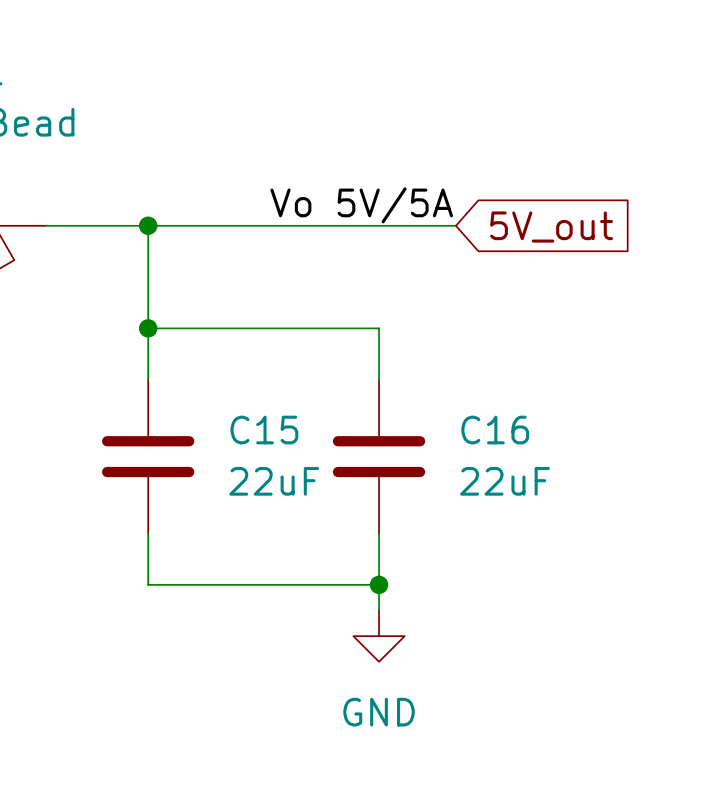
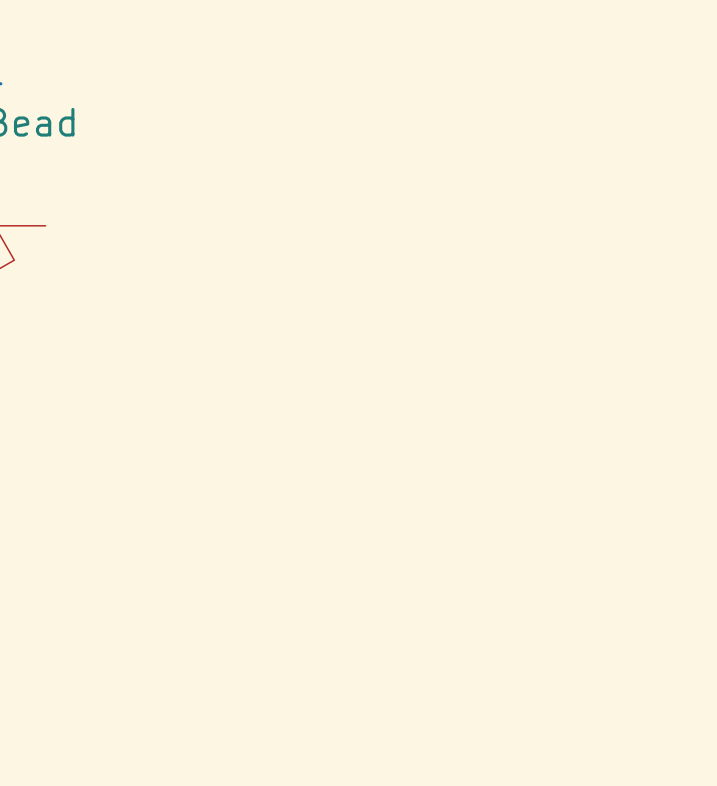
label: Vo 5V/5A (361, 205) -> none
wire: (45, 225) (455, 225) -> none
wire: (148, 225) (148, 379) -> none
junction: (148, 225) -> none
global label: 5V_out (551, 227) -> none
wire: (148, 328) (379, 328) (379, 379) -> none
junction: (148, 328) -> none
C15: 22uF (148, 456) -> none
C16: 22uF (379, 456) -> none
wire: (148, 533) (148, 584) (379, 584) -> none
wire: (379, 533) (379, 610) -> none
junction: (379, 584) -> none
power symbol: GND (379, 636) -> none

